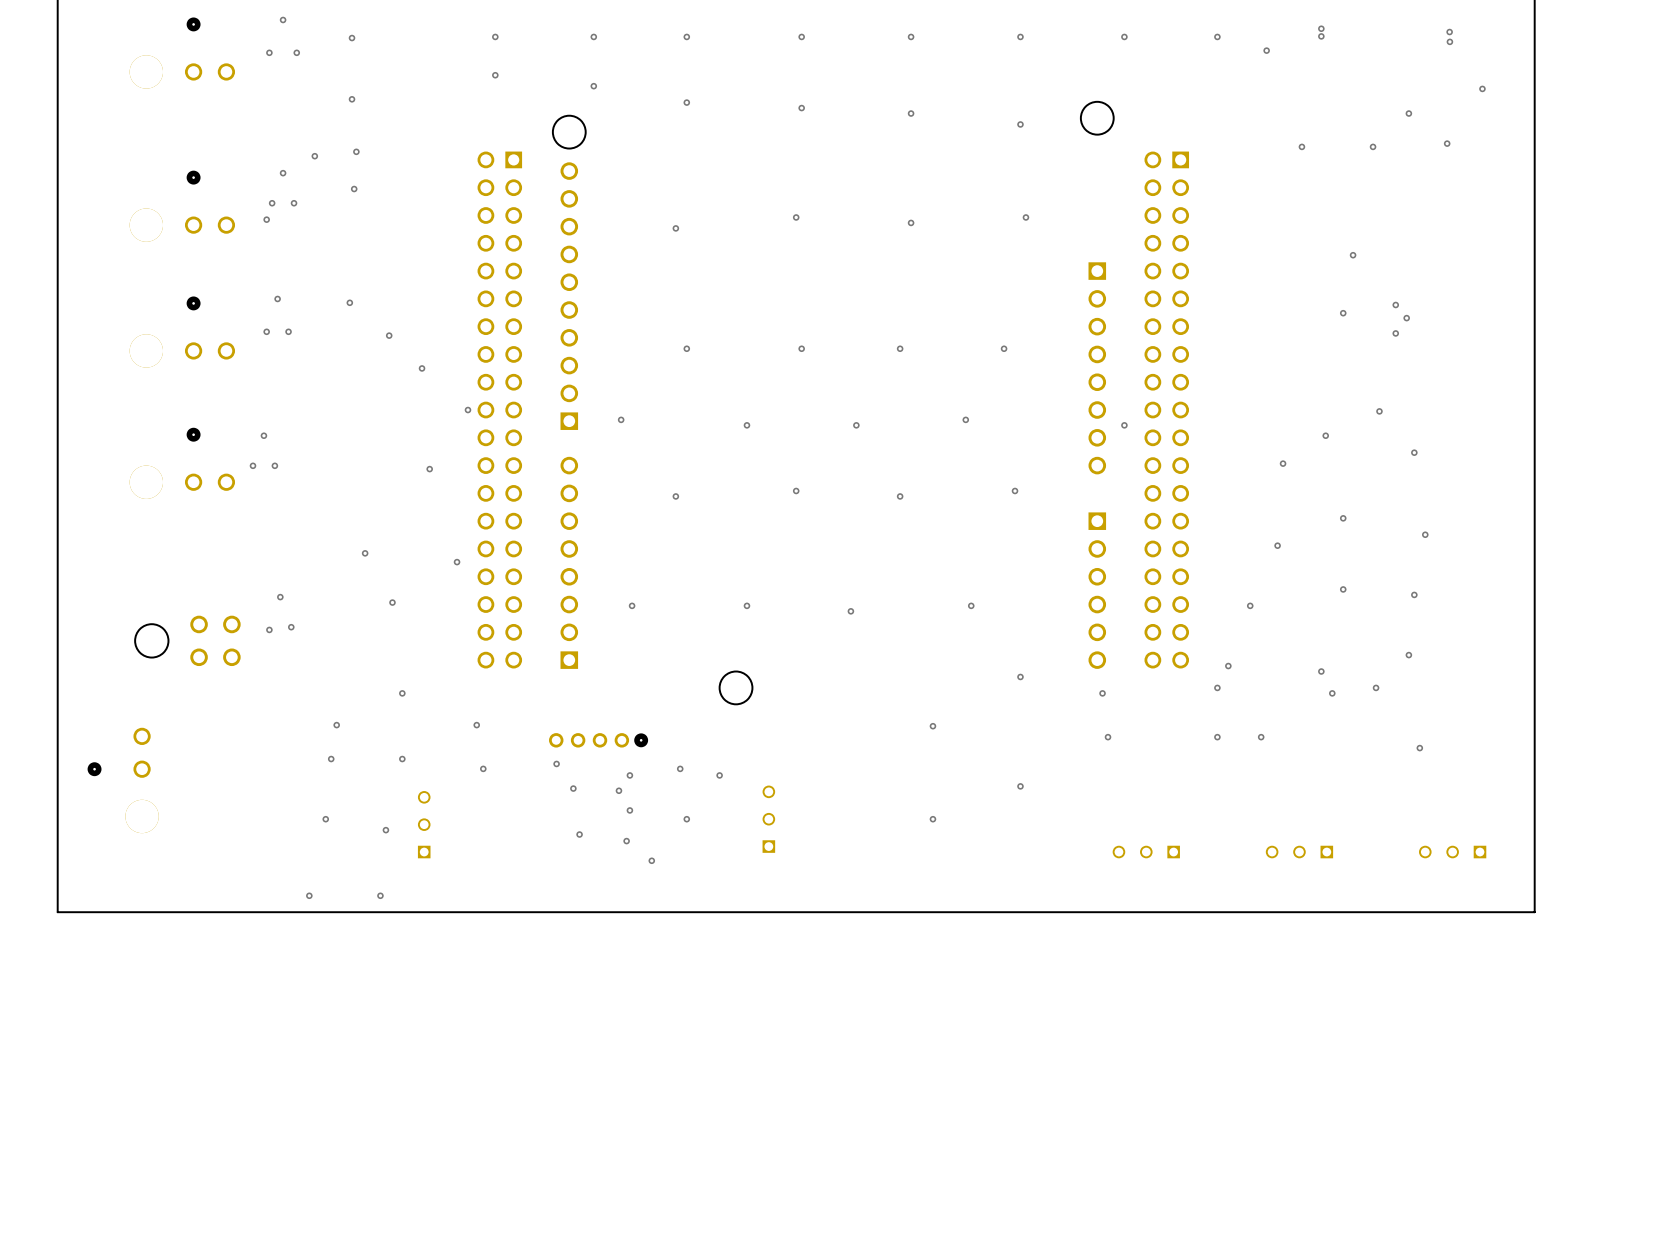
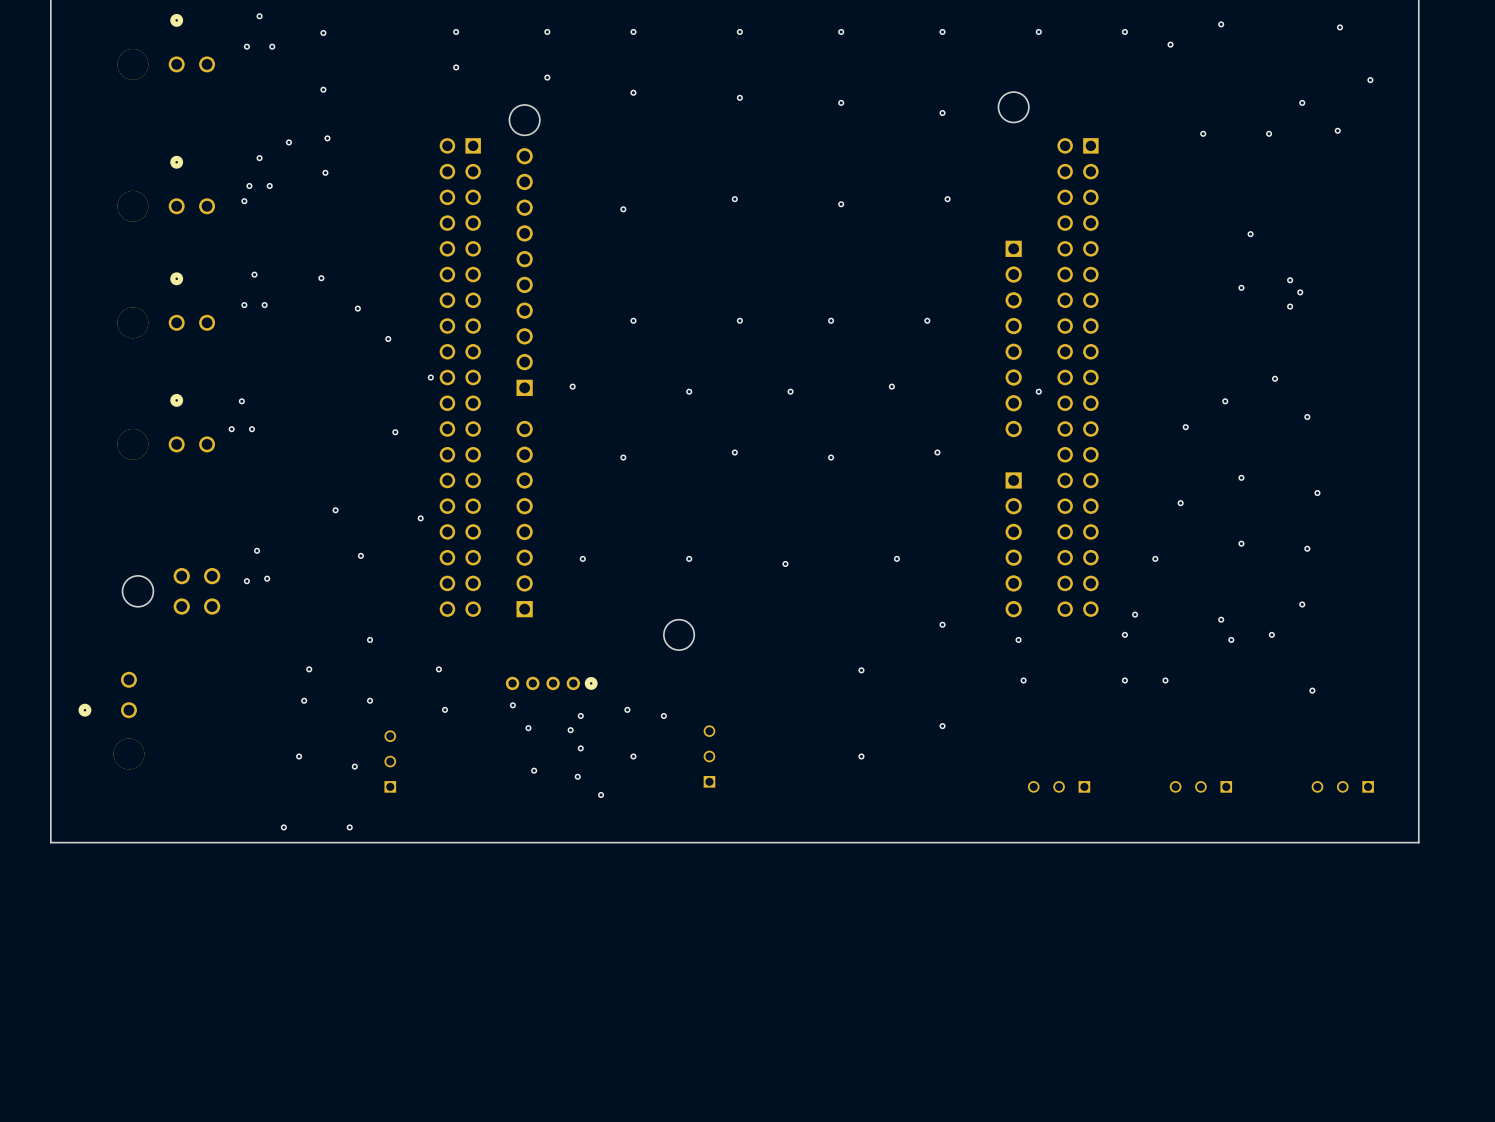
via: (1321, 36) -> none
via: (1449, 41) -> none

